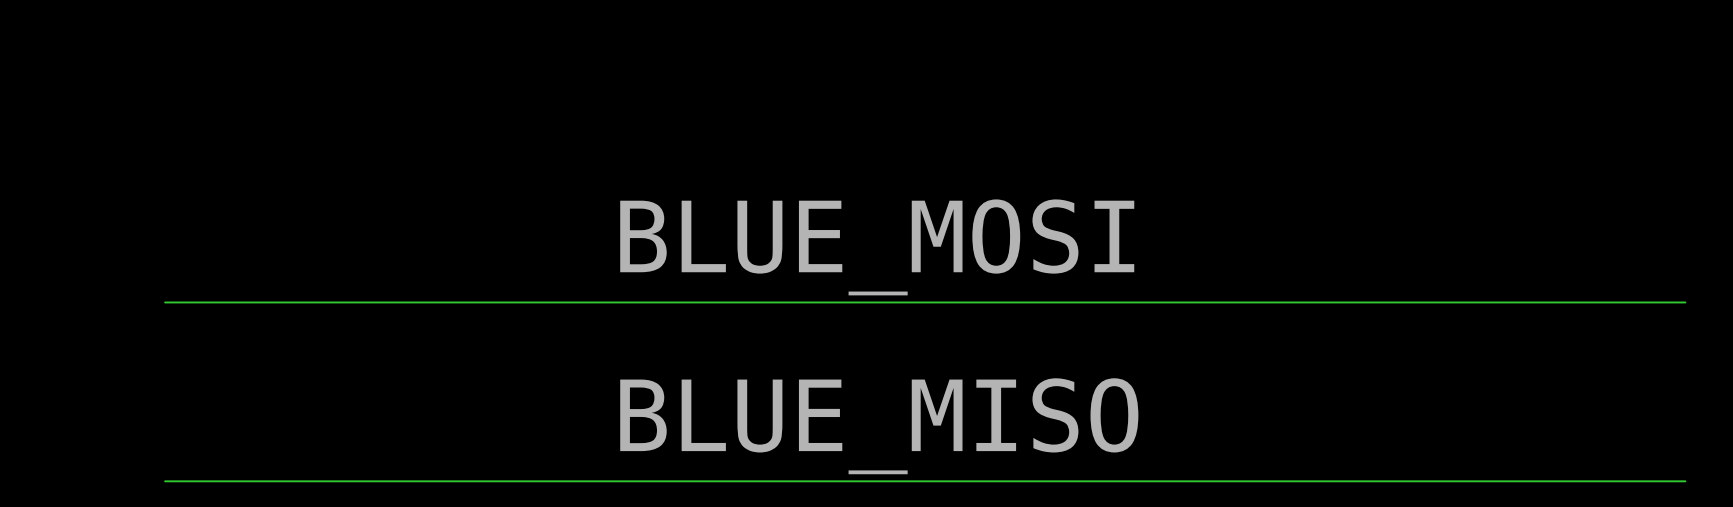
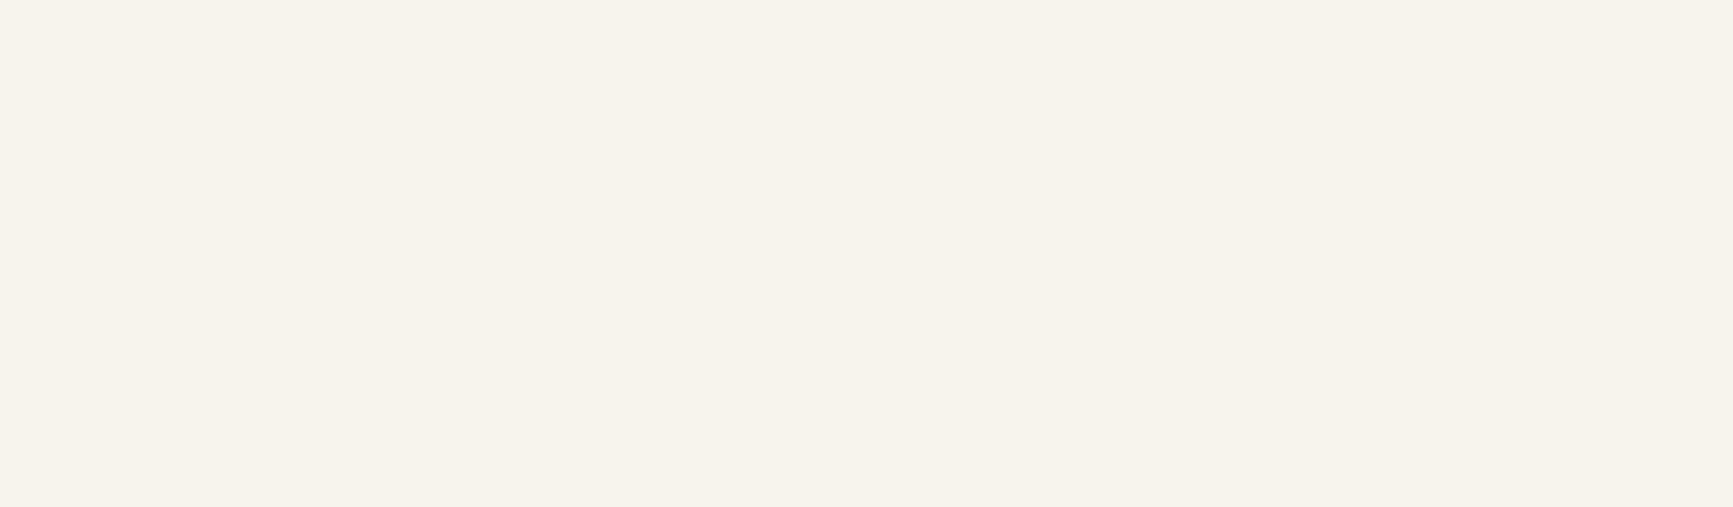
label: BLUE_MOSI (877, 247) -> none
wire: (165, 302) (1685, 302) -> none
label: BLUE_MISO (879, 426) -> none
wire: (165, 481) (1685, 481) -> none

